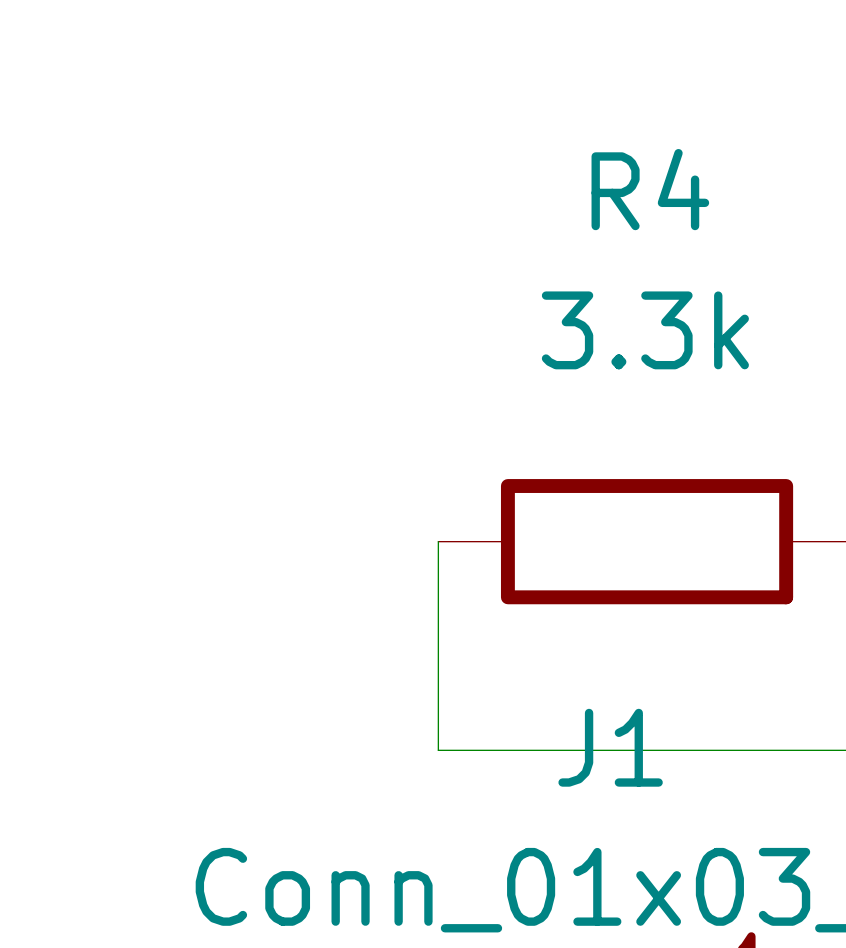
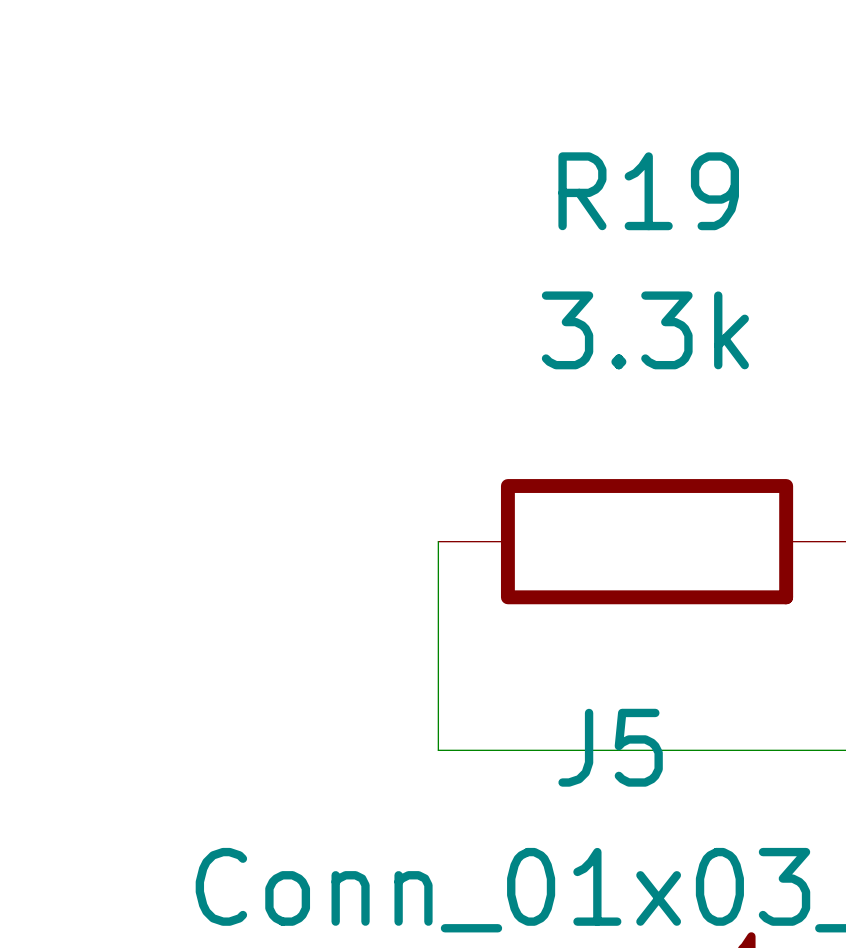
R4 name: R4 (650, 189) -> R19 (648, 191)
J1 name: J1 (610, 747) -> J5 (610, 747)

